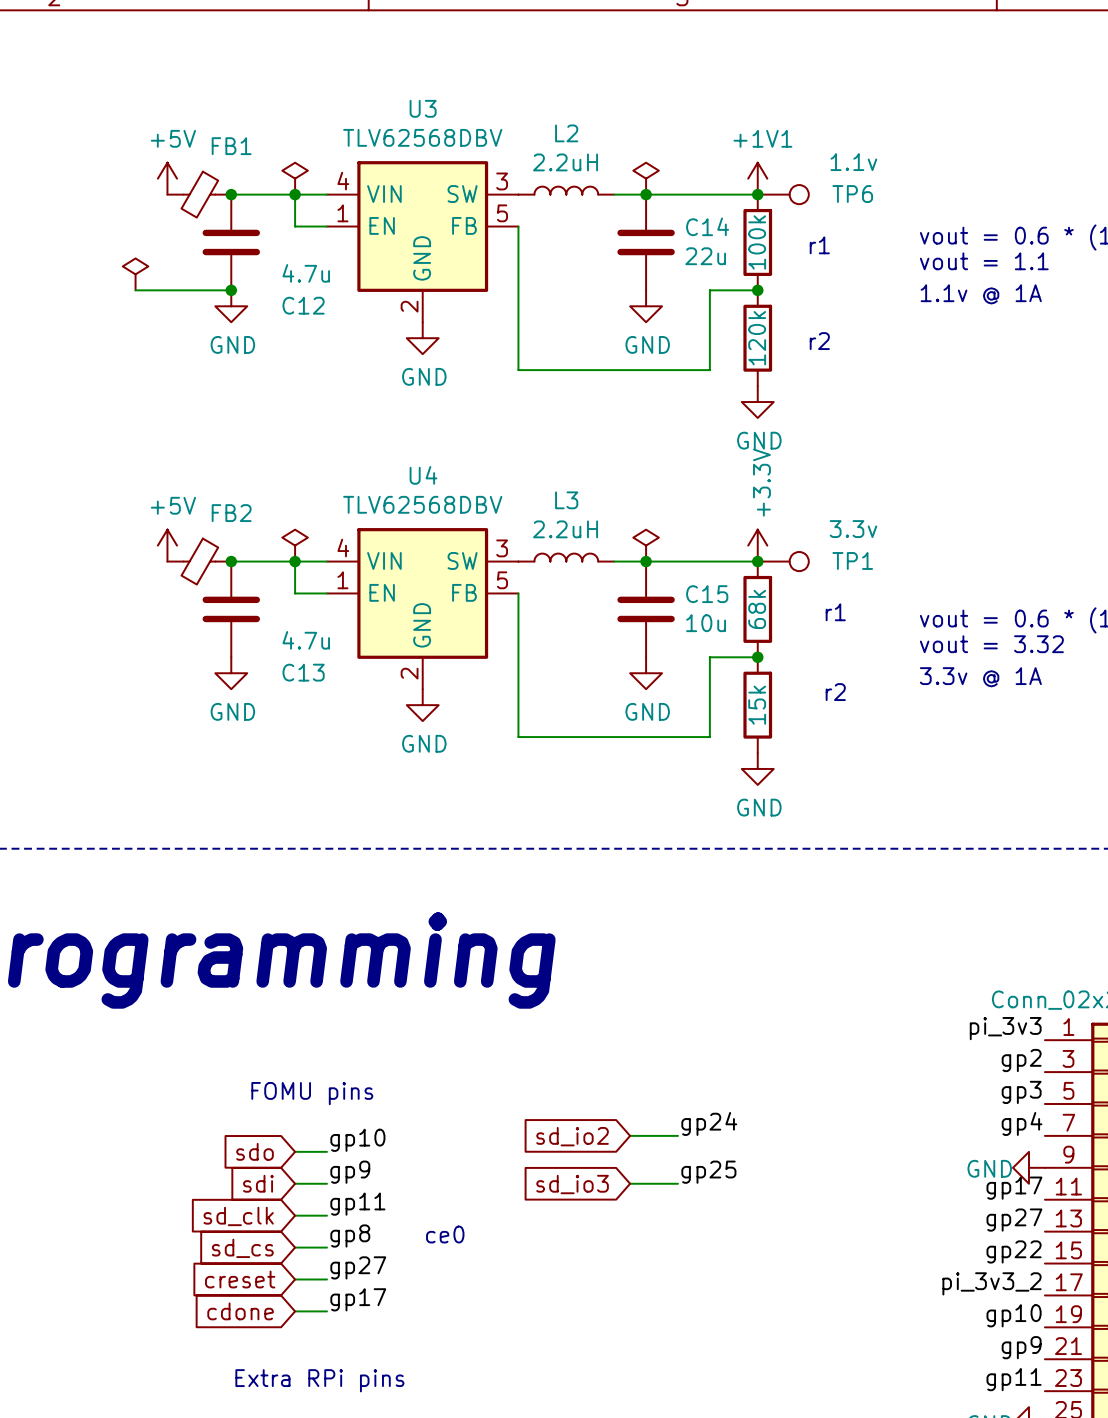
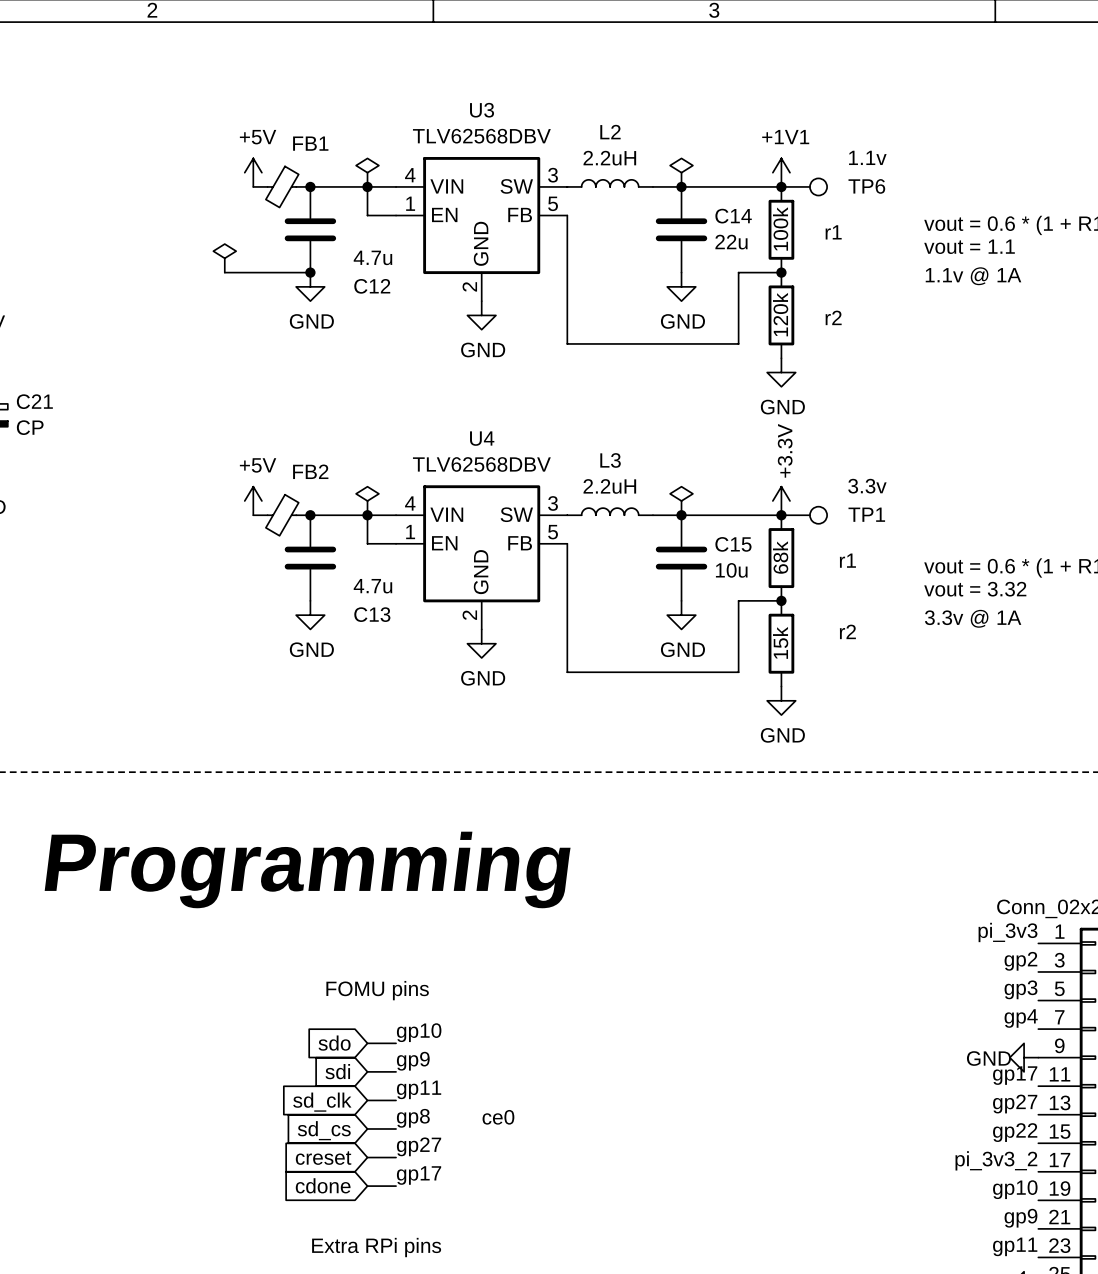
label: gp24 (709, 1123) -> none
wire: (630, 1135) (677, 1135) -> none
global label: sd_io2 (572, 1136) -> none
label: gp25 (708, 1172) -> none
wire: (630, 1183) (677, 1183) -> none
global label: sd_io3 (572, 1184) -> none

